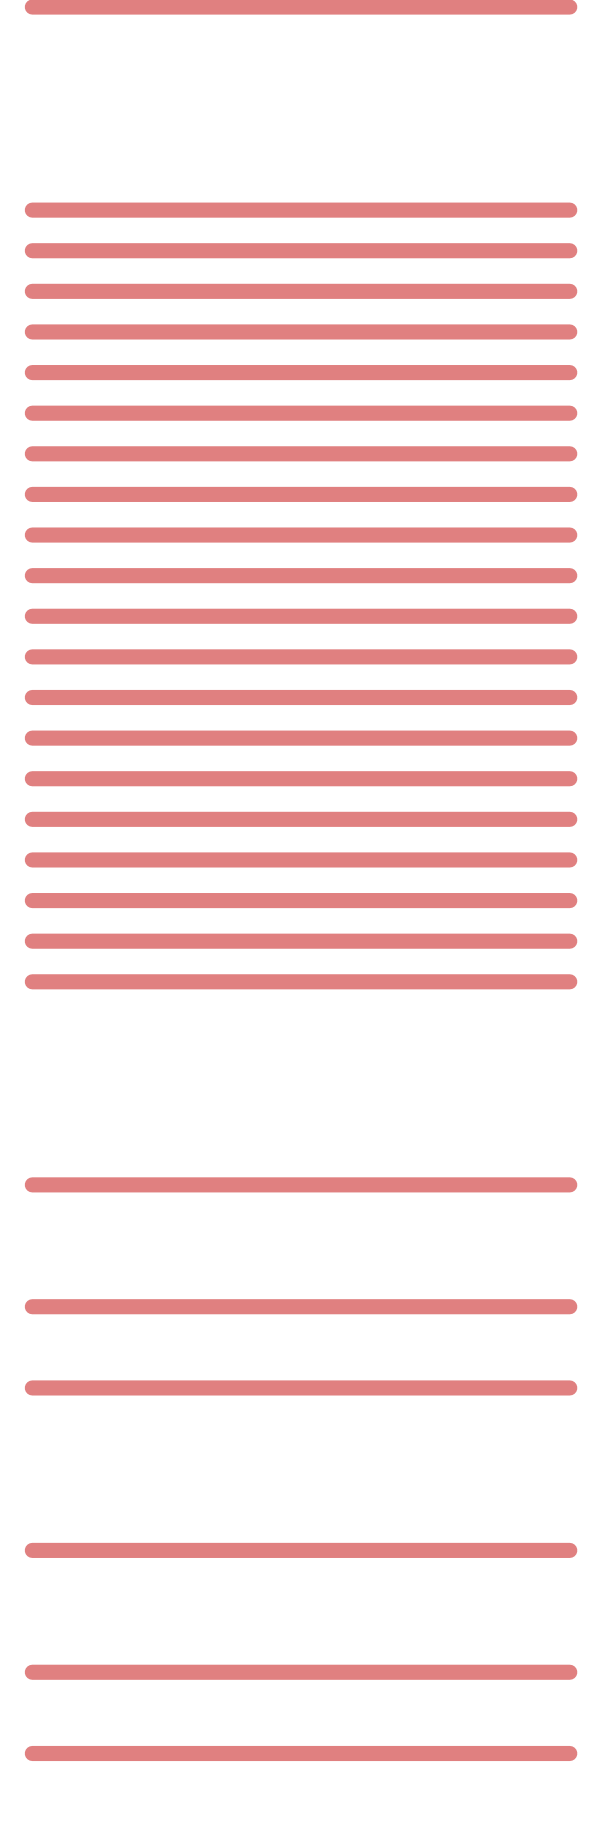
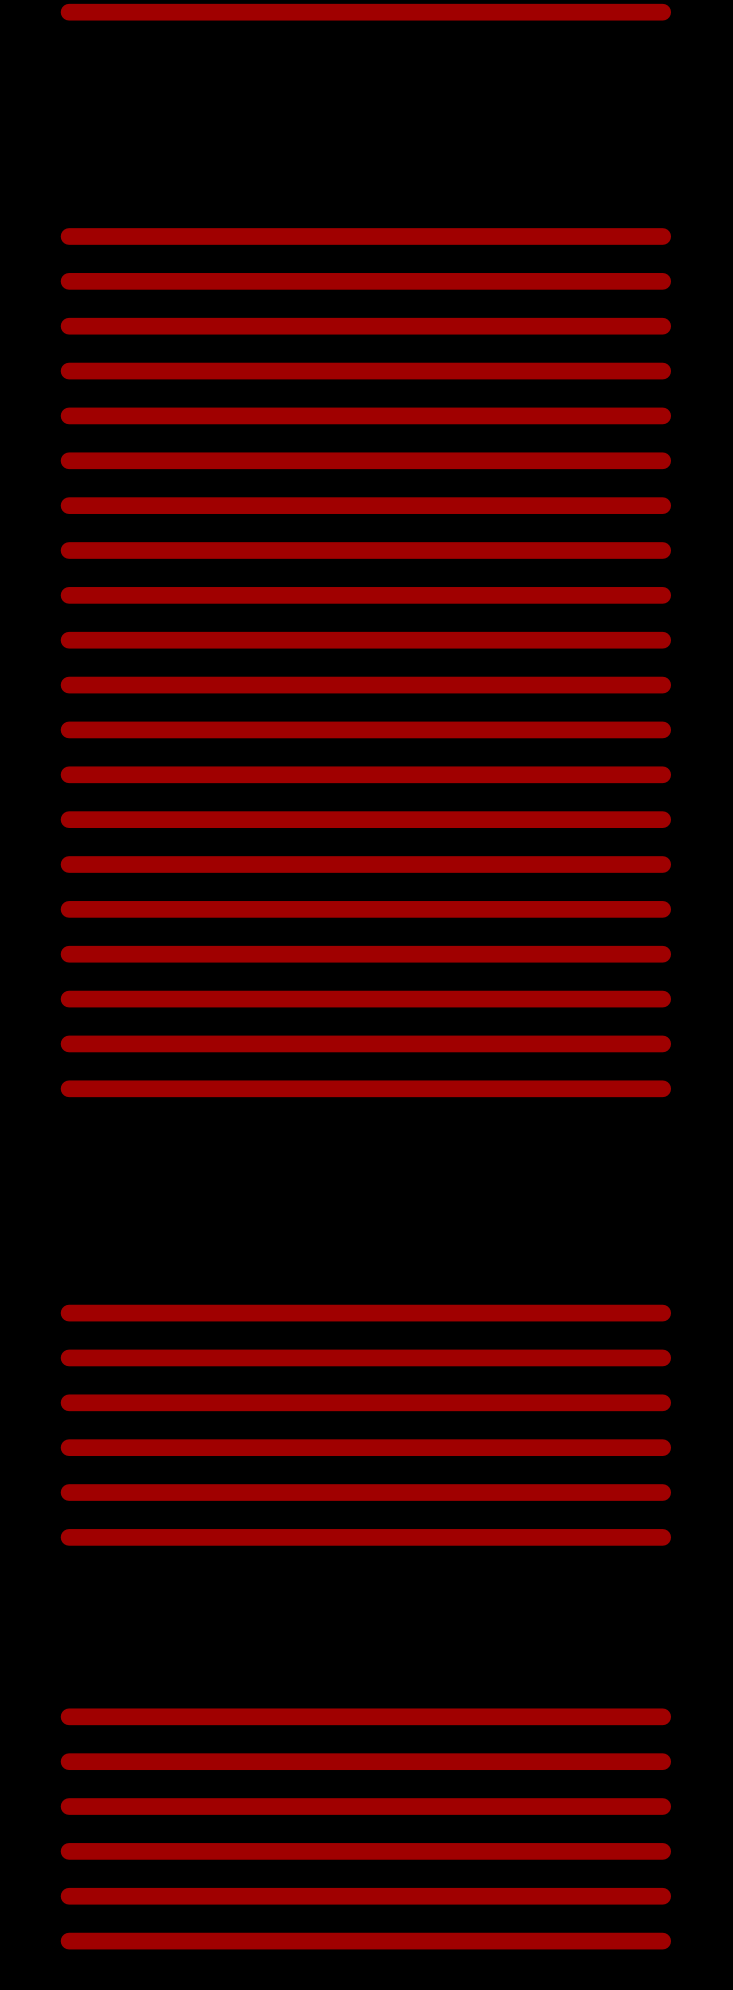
track: none -> (69, 1357) (662, 1357)
track: none -> (69, 1402) (662, 1402)
track: none -> (69, 1492) (662, 1492)
track: none -> (69, 1761) (662, 1761)
track: none -> (69, 1806) (662, 1806)
track: none -> (69, 1896) (662, 1896)

